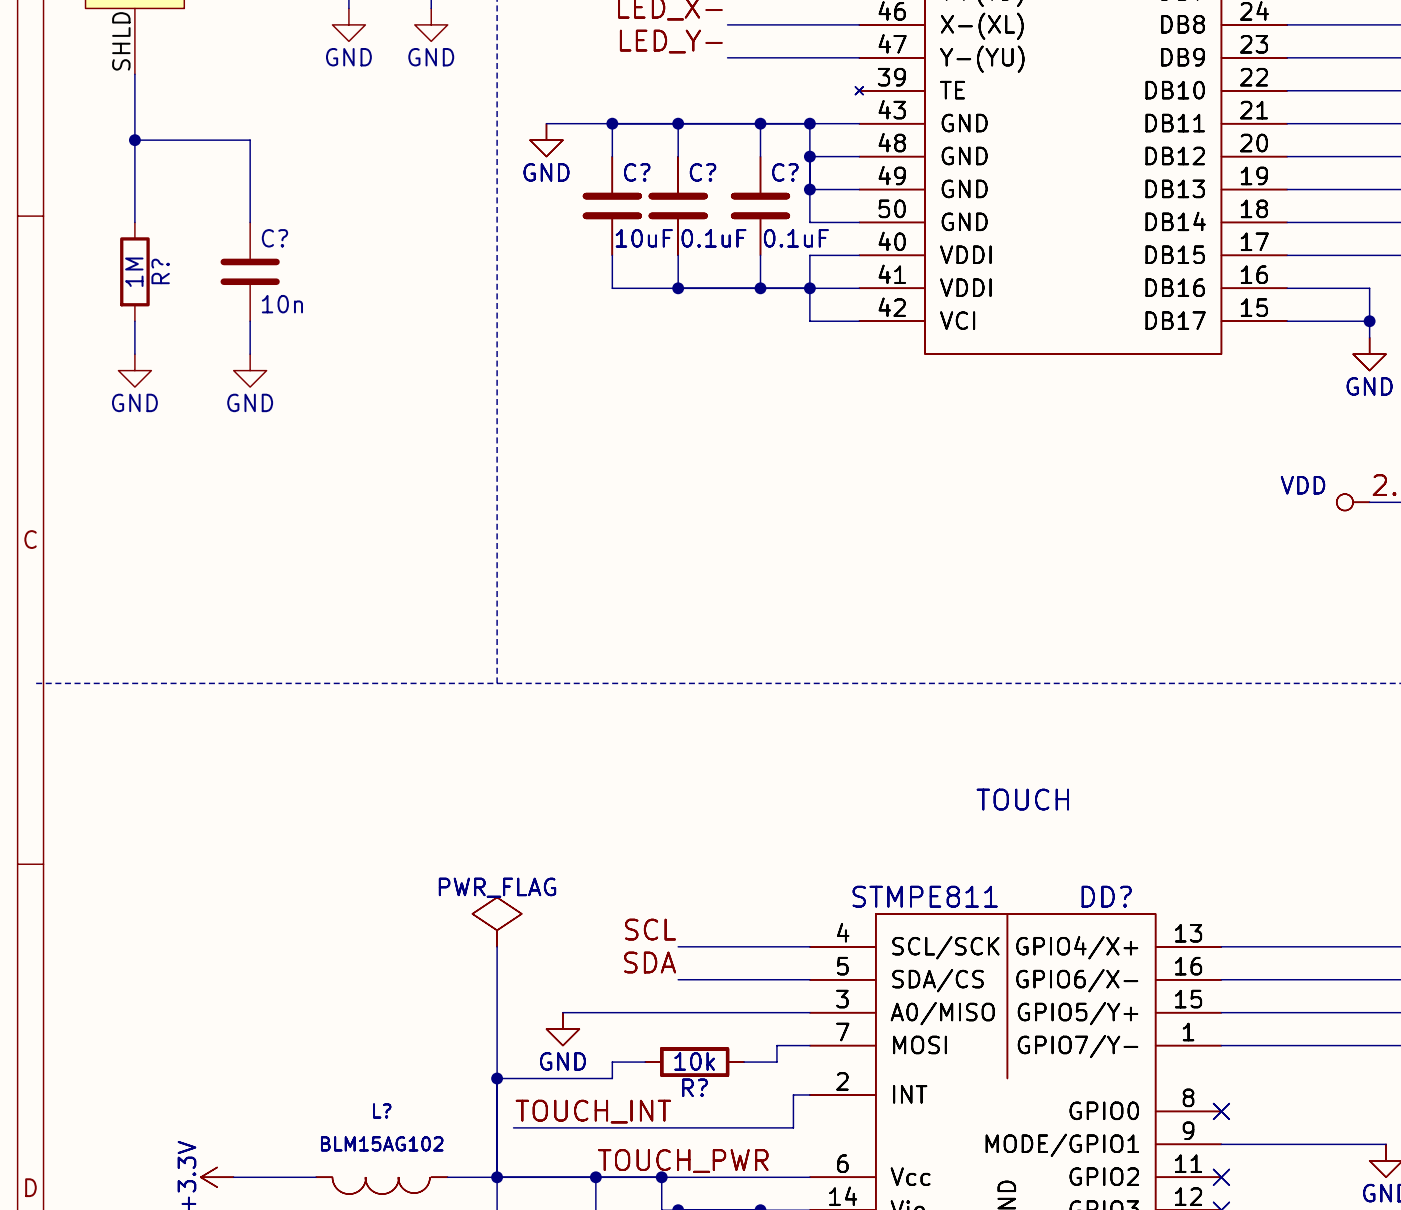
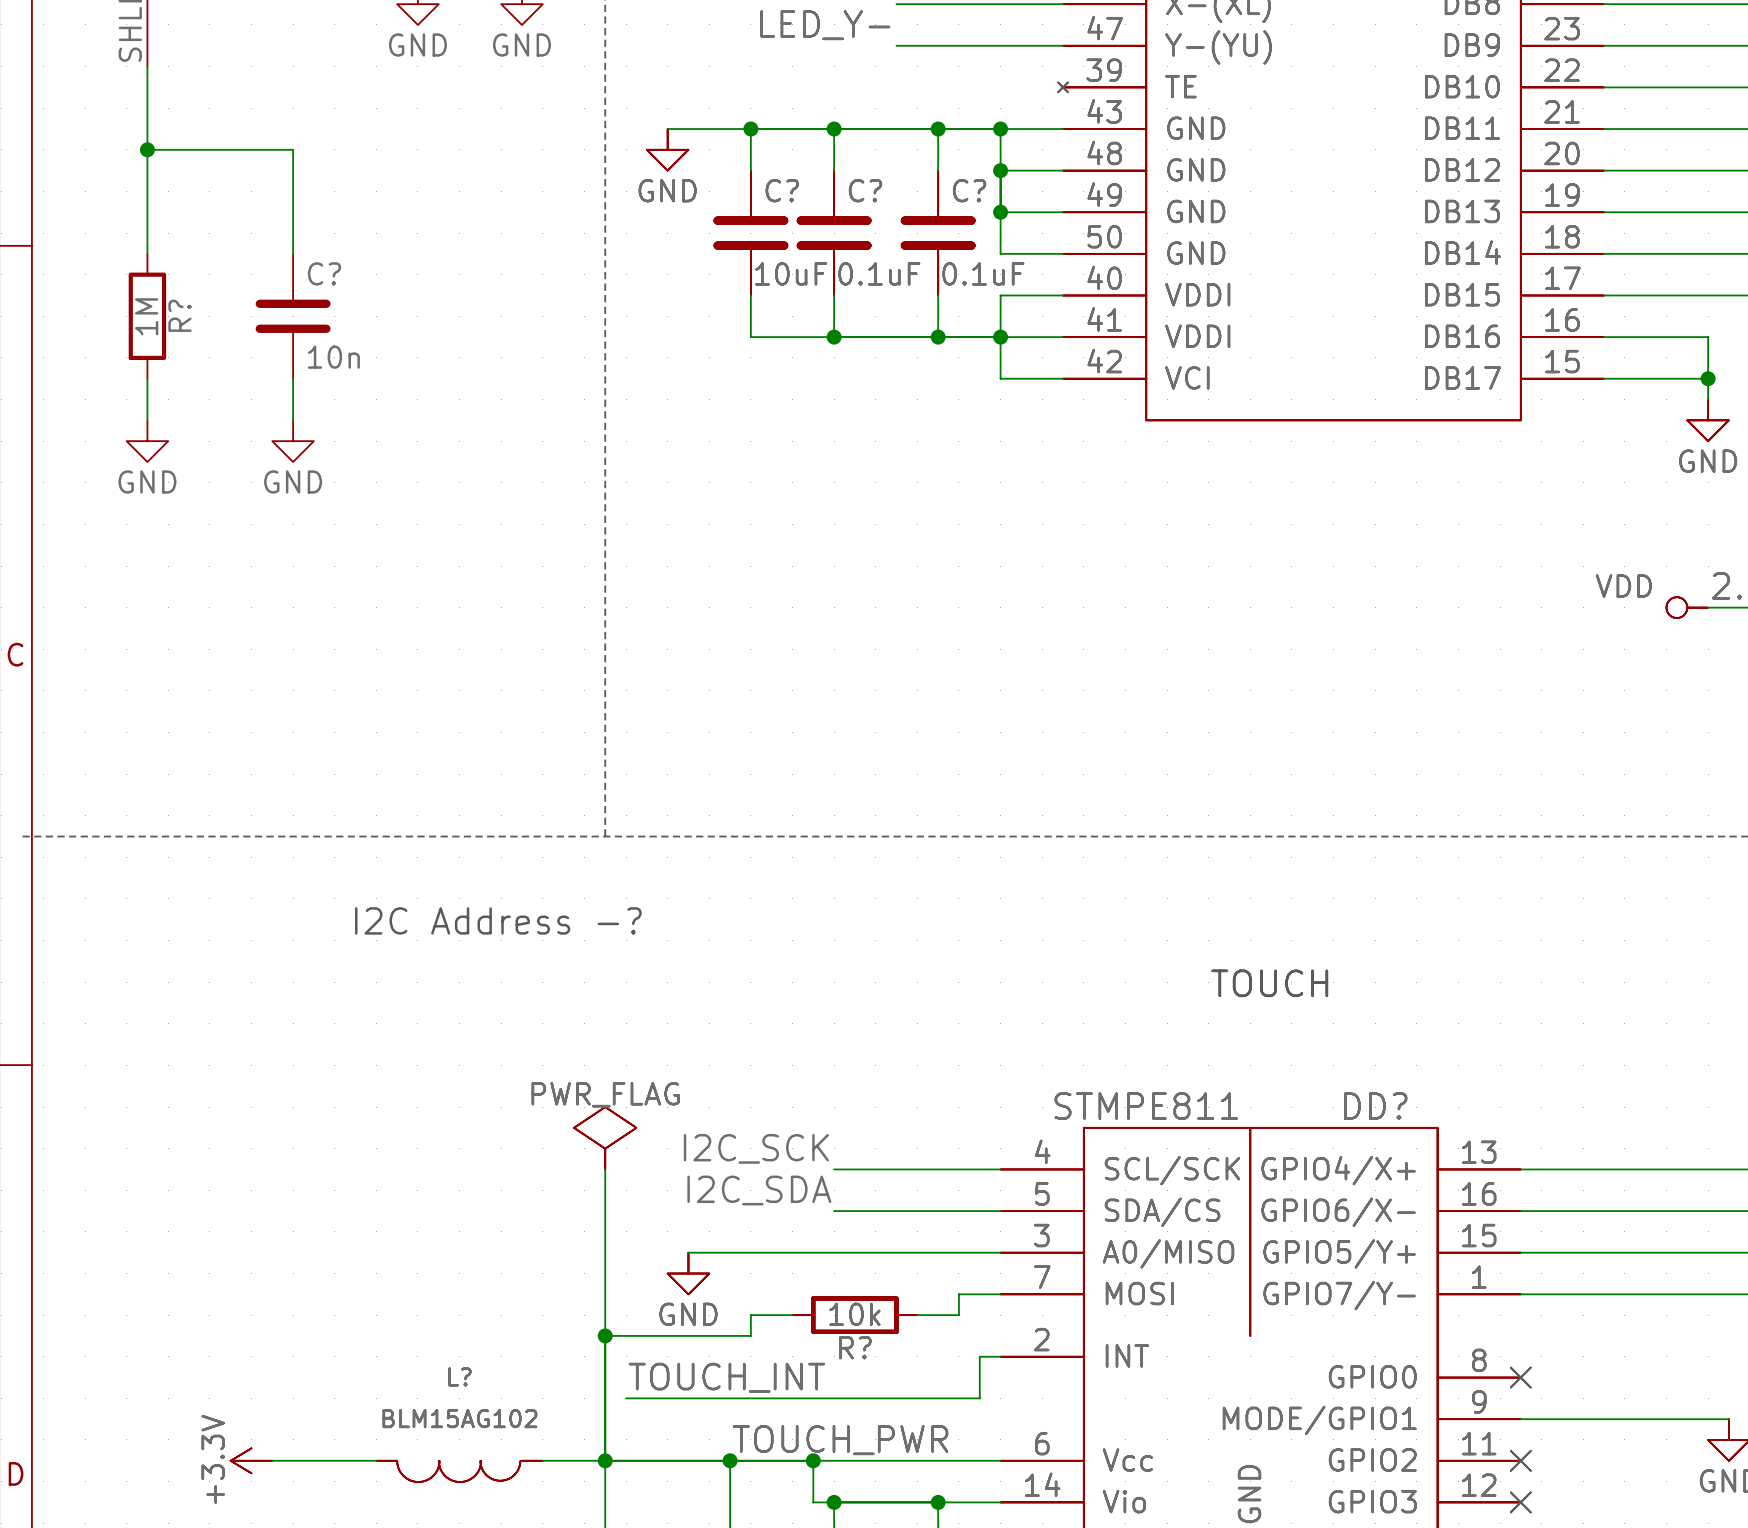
text: none -> I2C Address -? (498, 920)
label: SCL (650, 929) -> I2C_SCK (756, 1148)
label: SDA (650, 962) -> I2C_SDA (759, 1190)

